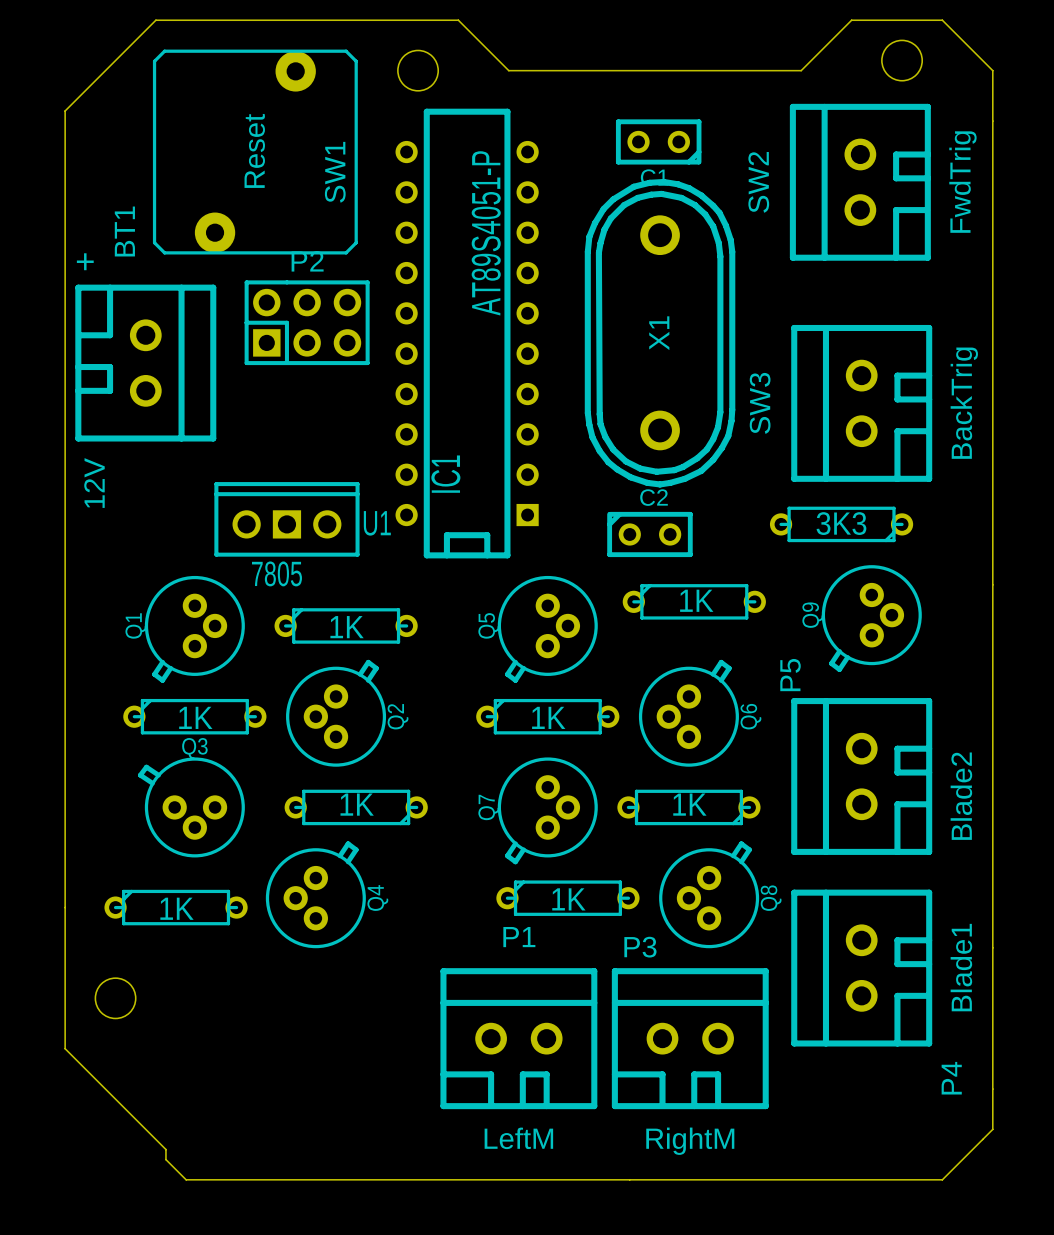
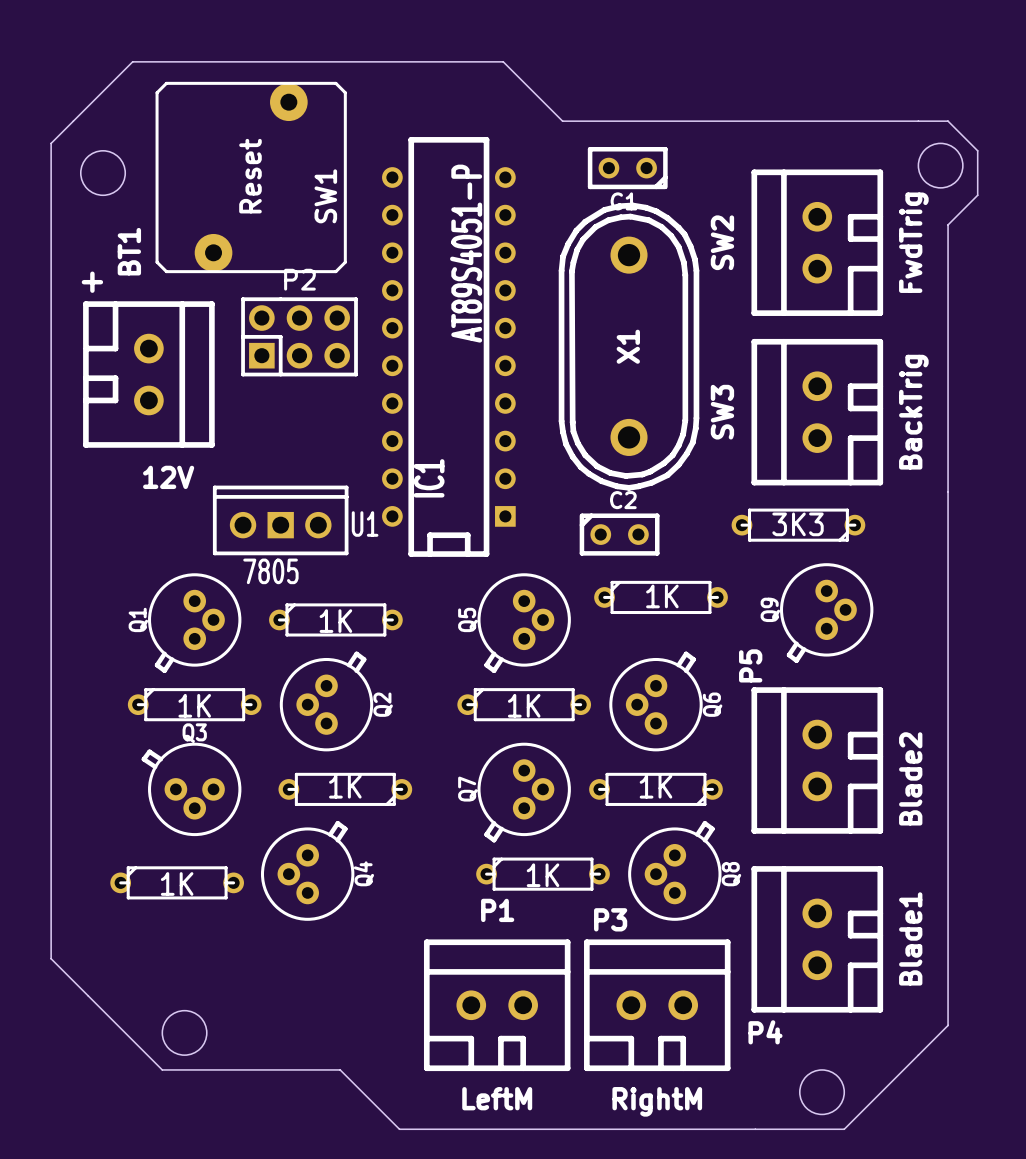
board edge: (155, 20) (458, 20) (508, 70) (801, 70) (851, 20) (942, 20) (992, 70) (992, 1129) (942, 1179) (186, 1179) (165, 1159) (165, 1149) (65, 1048) (65, 110) (155, 20) -> (132, 61) (51, 143) (51, 958) (162, 1069) (340, 1069) (399, 1129) (844, 1129) (948, 1025) (948, 224) (977, 195) (977, 150) (948, 121) (562, 121) (503, 61) (132, 61)
round board edge: [881, 39, 924, 82] -> none
round board edge: [397, 49, 440, 92] -> none
round board edge: none -> [917, 142, 964, 189]
round board edge: none -> [80, 150, 126, 197]
SW2 position: (860, 182) -> (817, 242)
BT1 value rotation: 0° (94, 483) -> 90° clockwise (168, 477)
BT1 value position: 12V (94, 483) -> 12V (168, 477)
round board edge: [94, 977, 137, 1020] -> none
round board edge: none -> [161, 1009, 208, 1056]
P4 name rotation: 0° (951, 1078) -> 90° clockwise (765, 1032)
P4 name position: P4 (951, 1078) -> P4 (765, 1032)
round board edge: none -> [799, 1069, 846, 1116]

